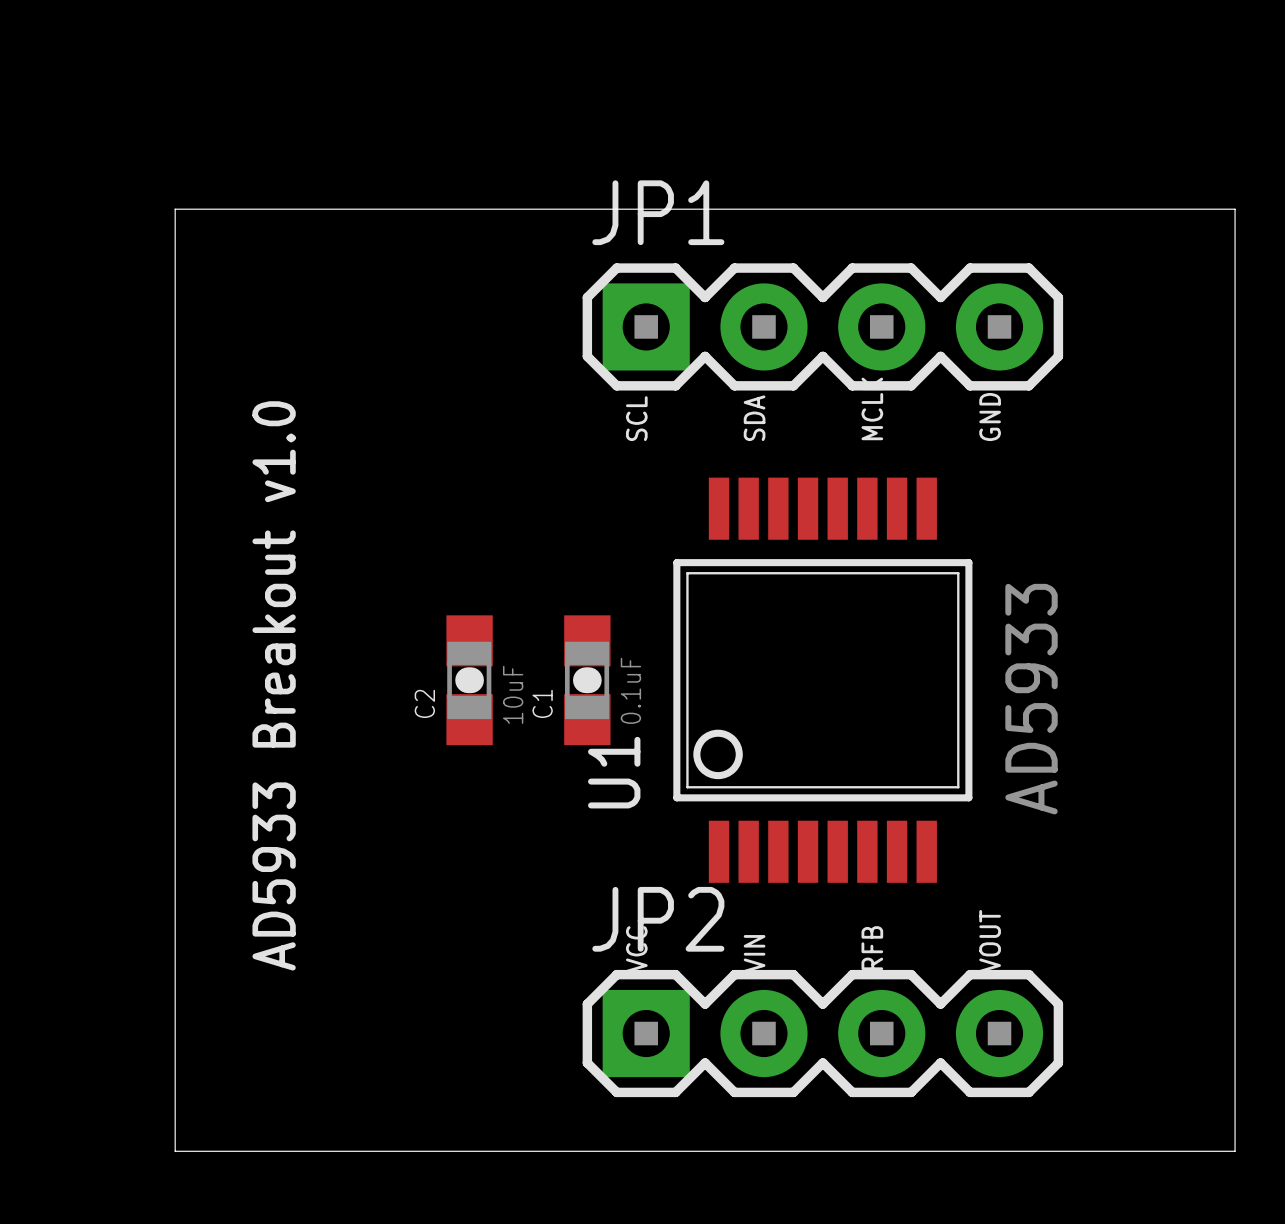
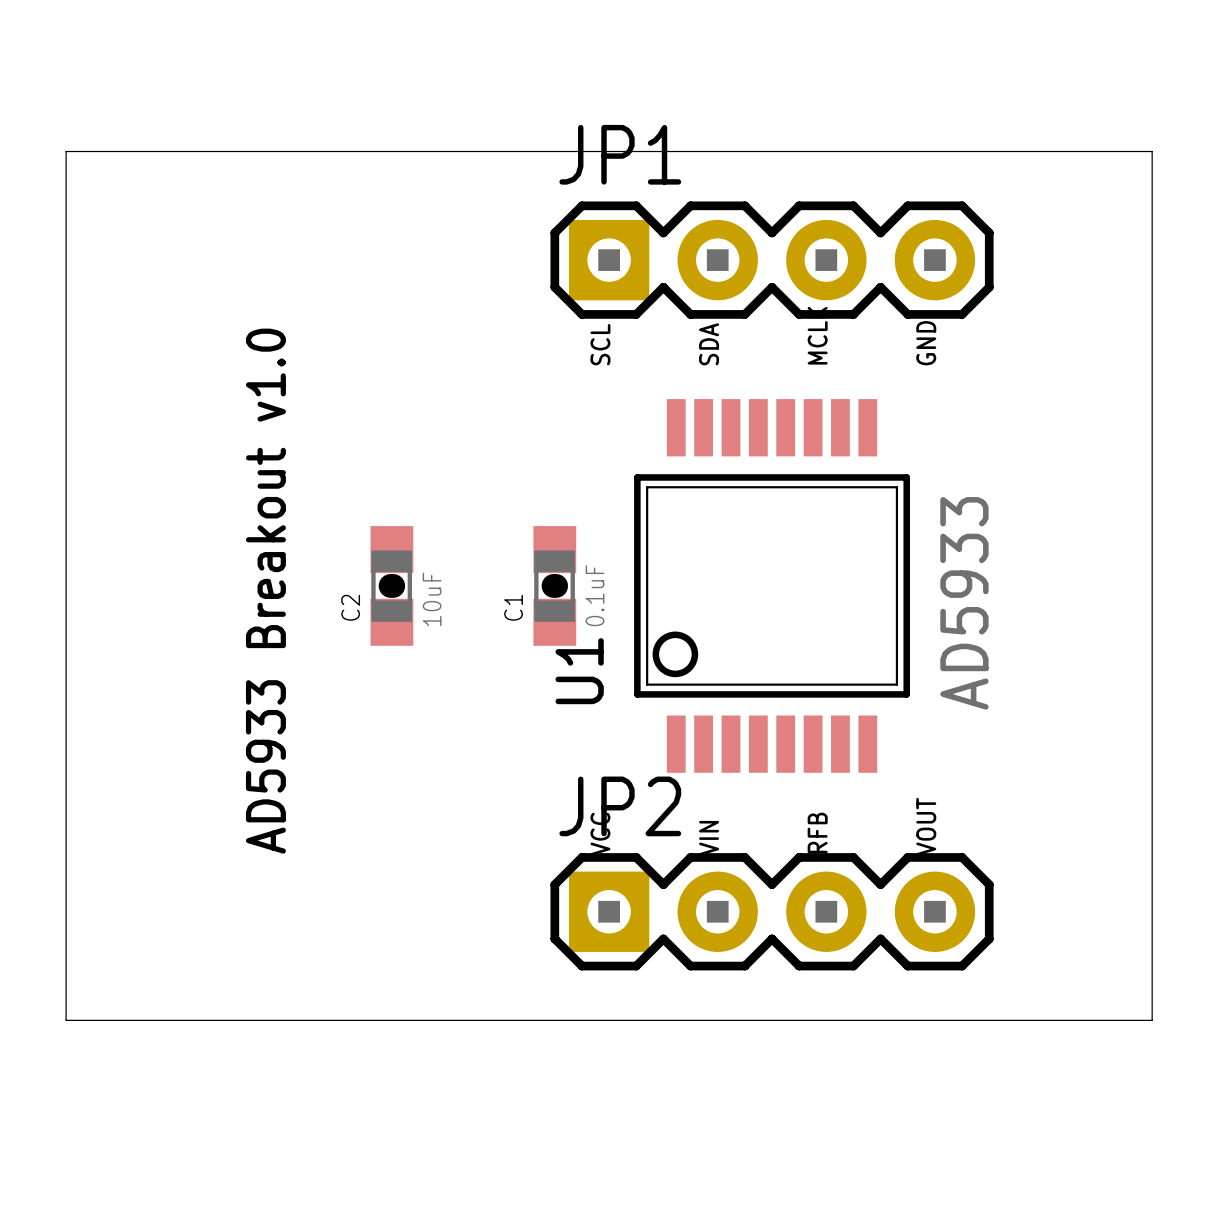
board edge: (175, 209) (175, 1151) -> (174, 151) (66, 151) (66, 1020) (174, 1020)
C2 position: (469, 680) -> (391, 585)

